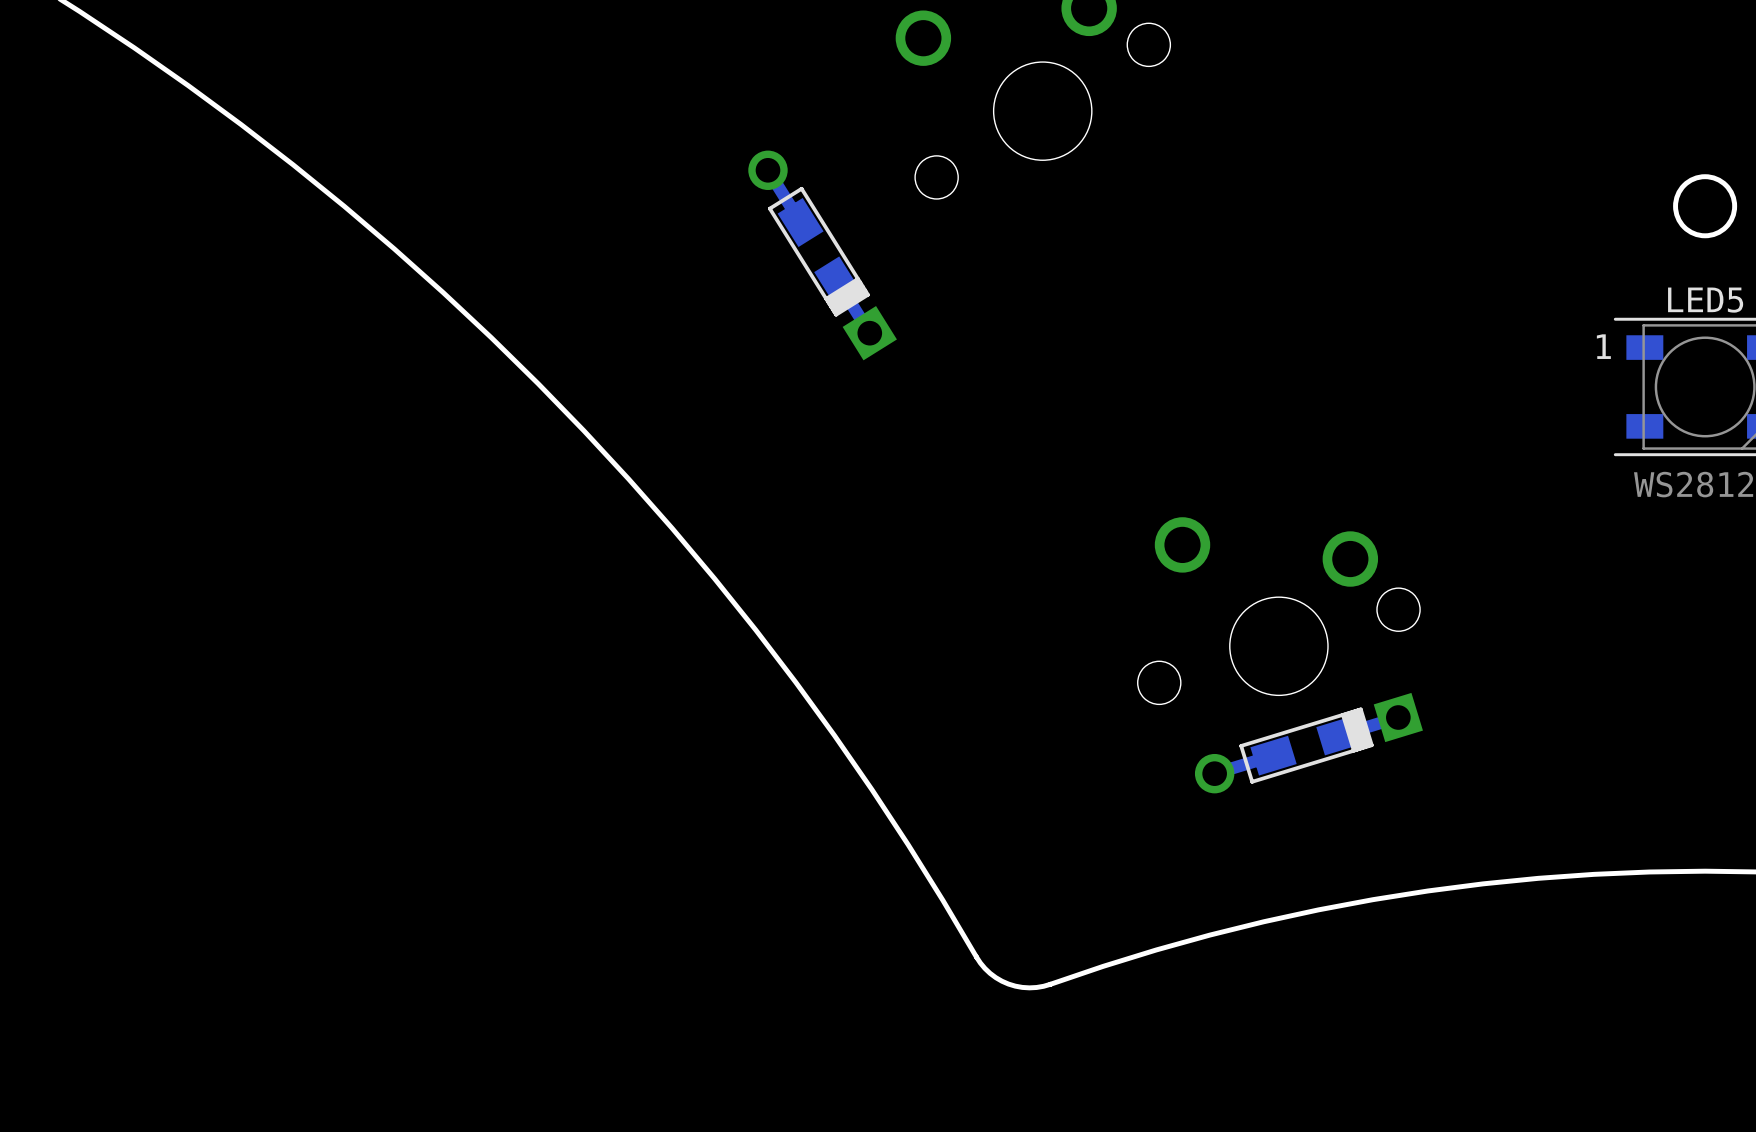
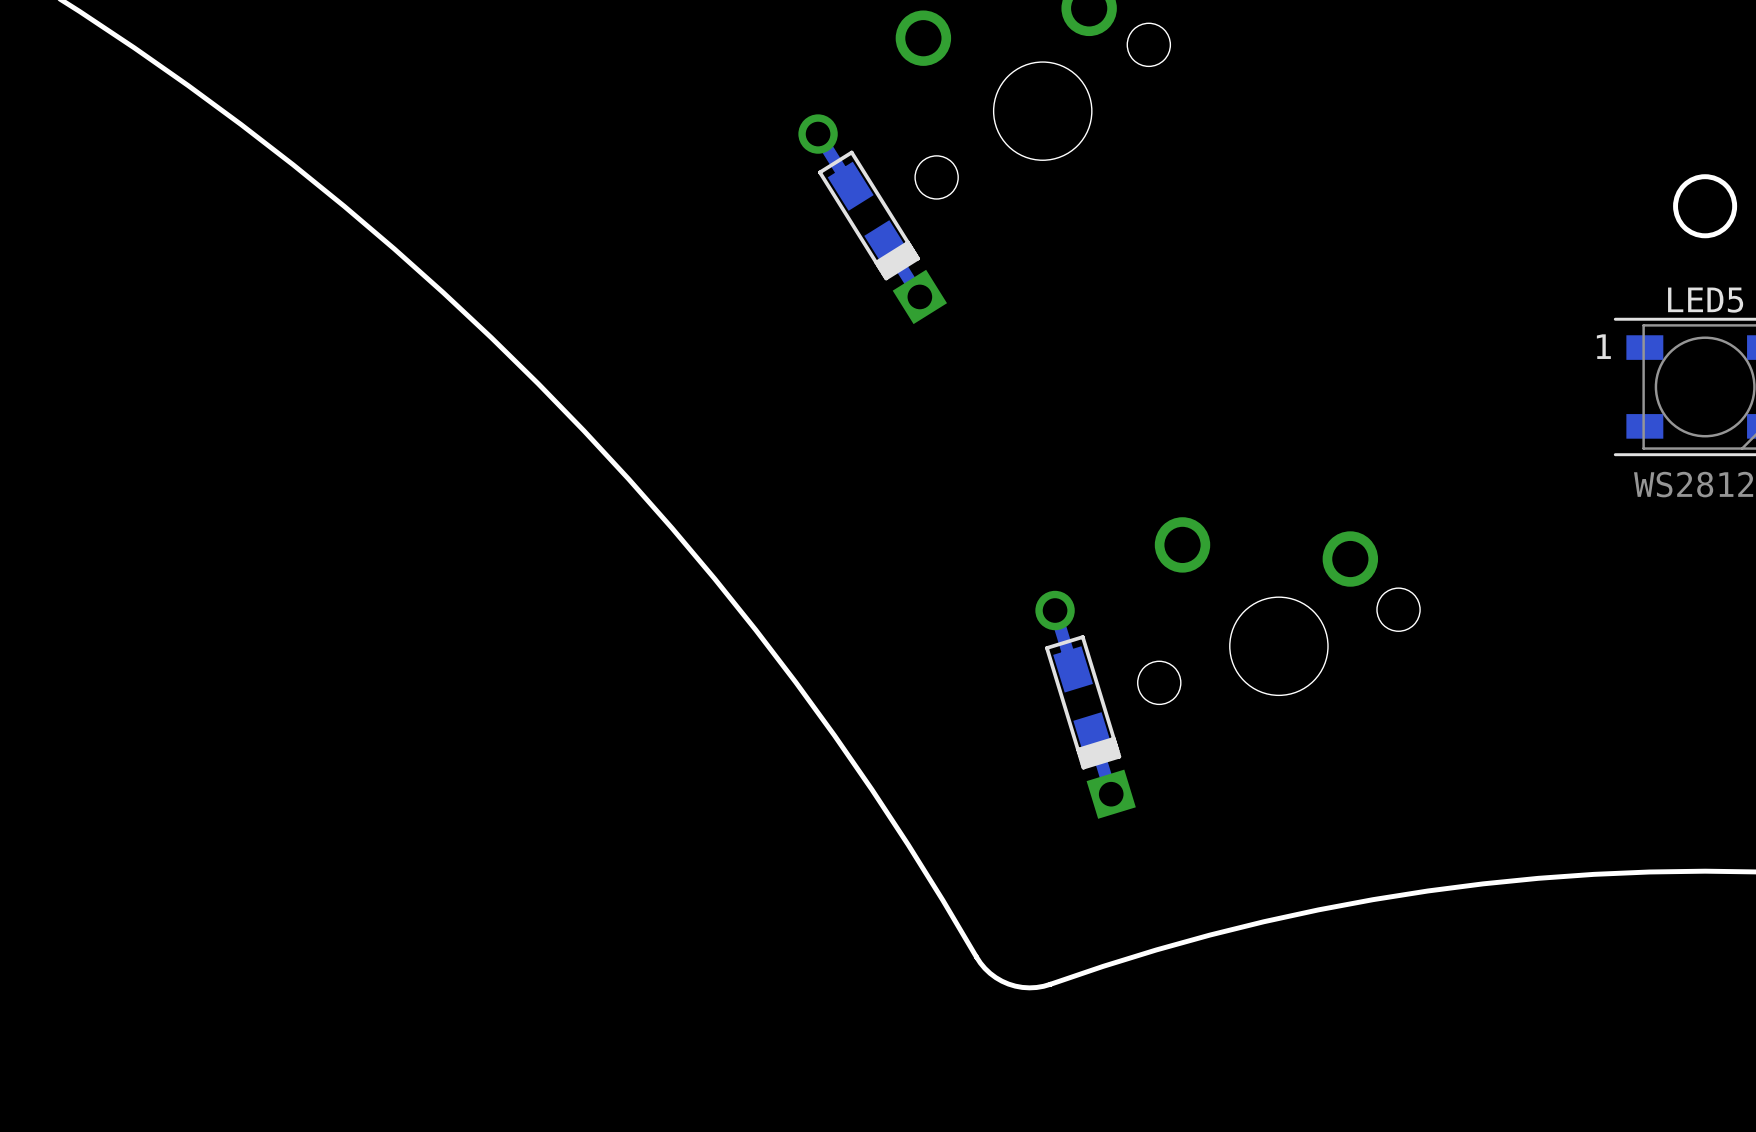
part position: (822, 255) -> (872, 219)
part rotation: 0° (1308, 743) -> 90° clockwise (1085, 704)
part position: (1308, 743) -> (1085, 704)

